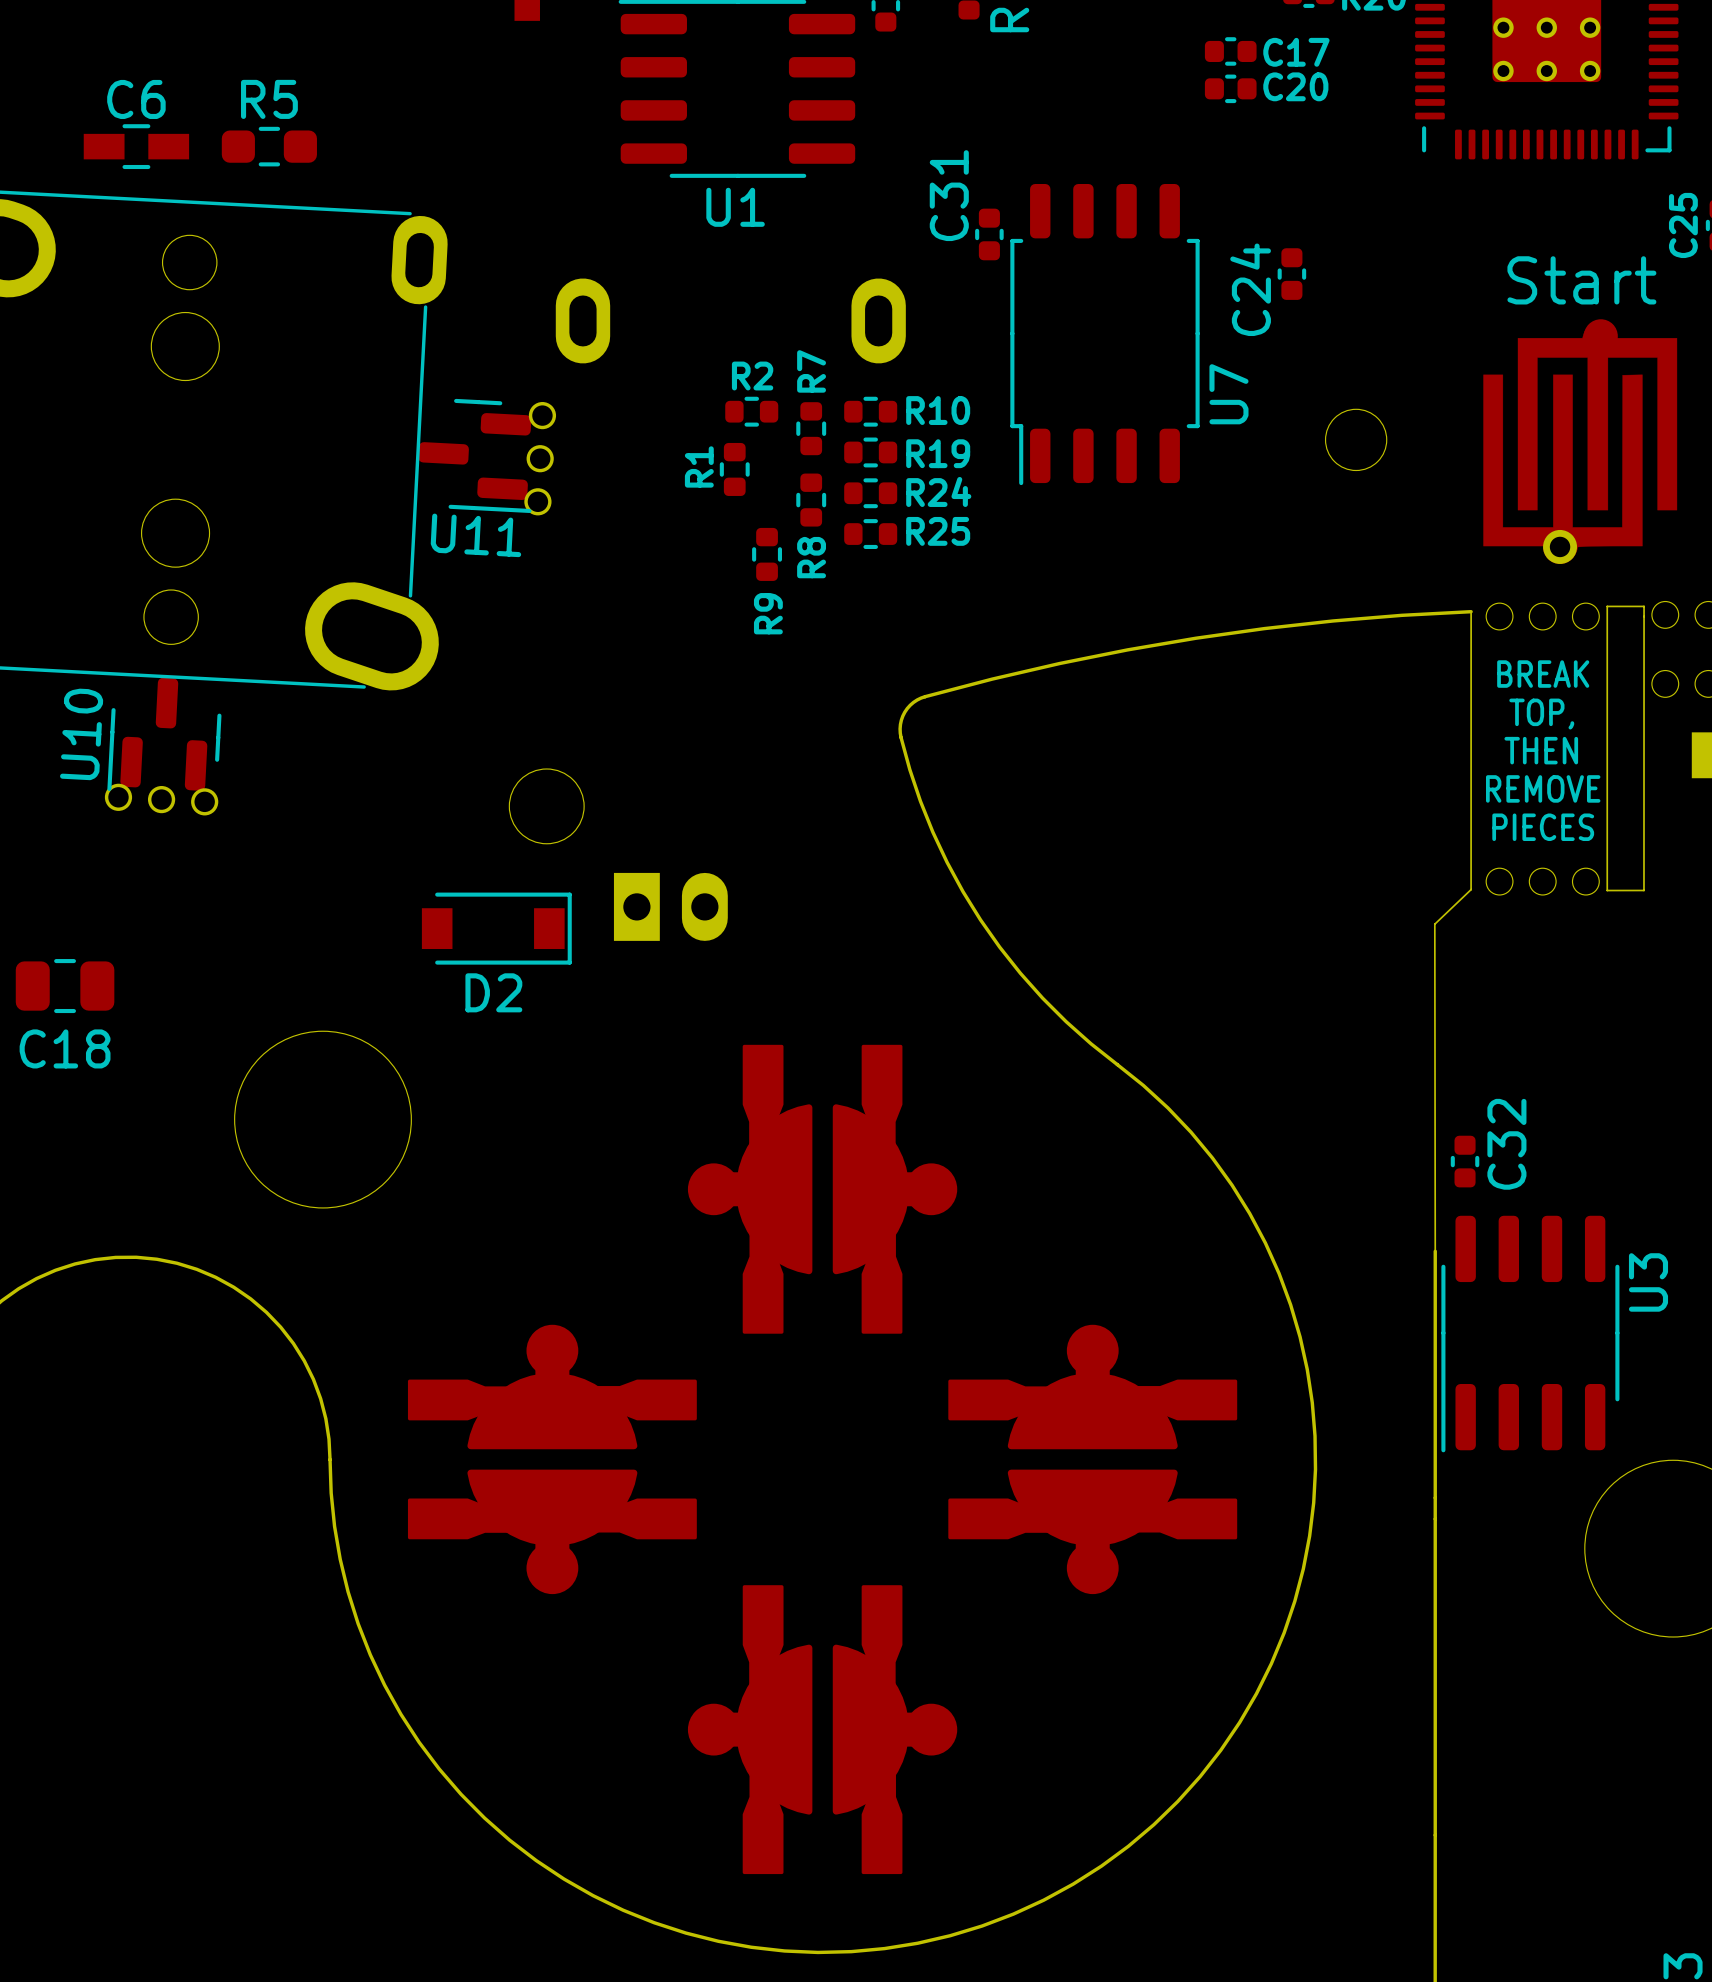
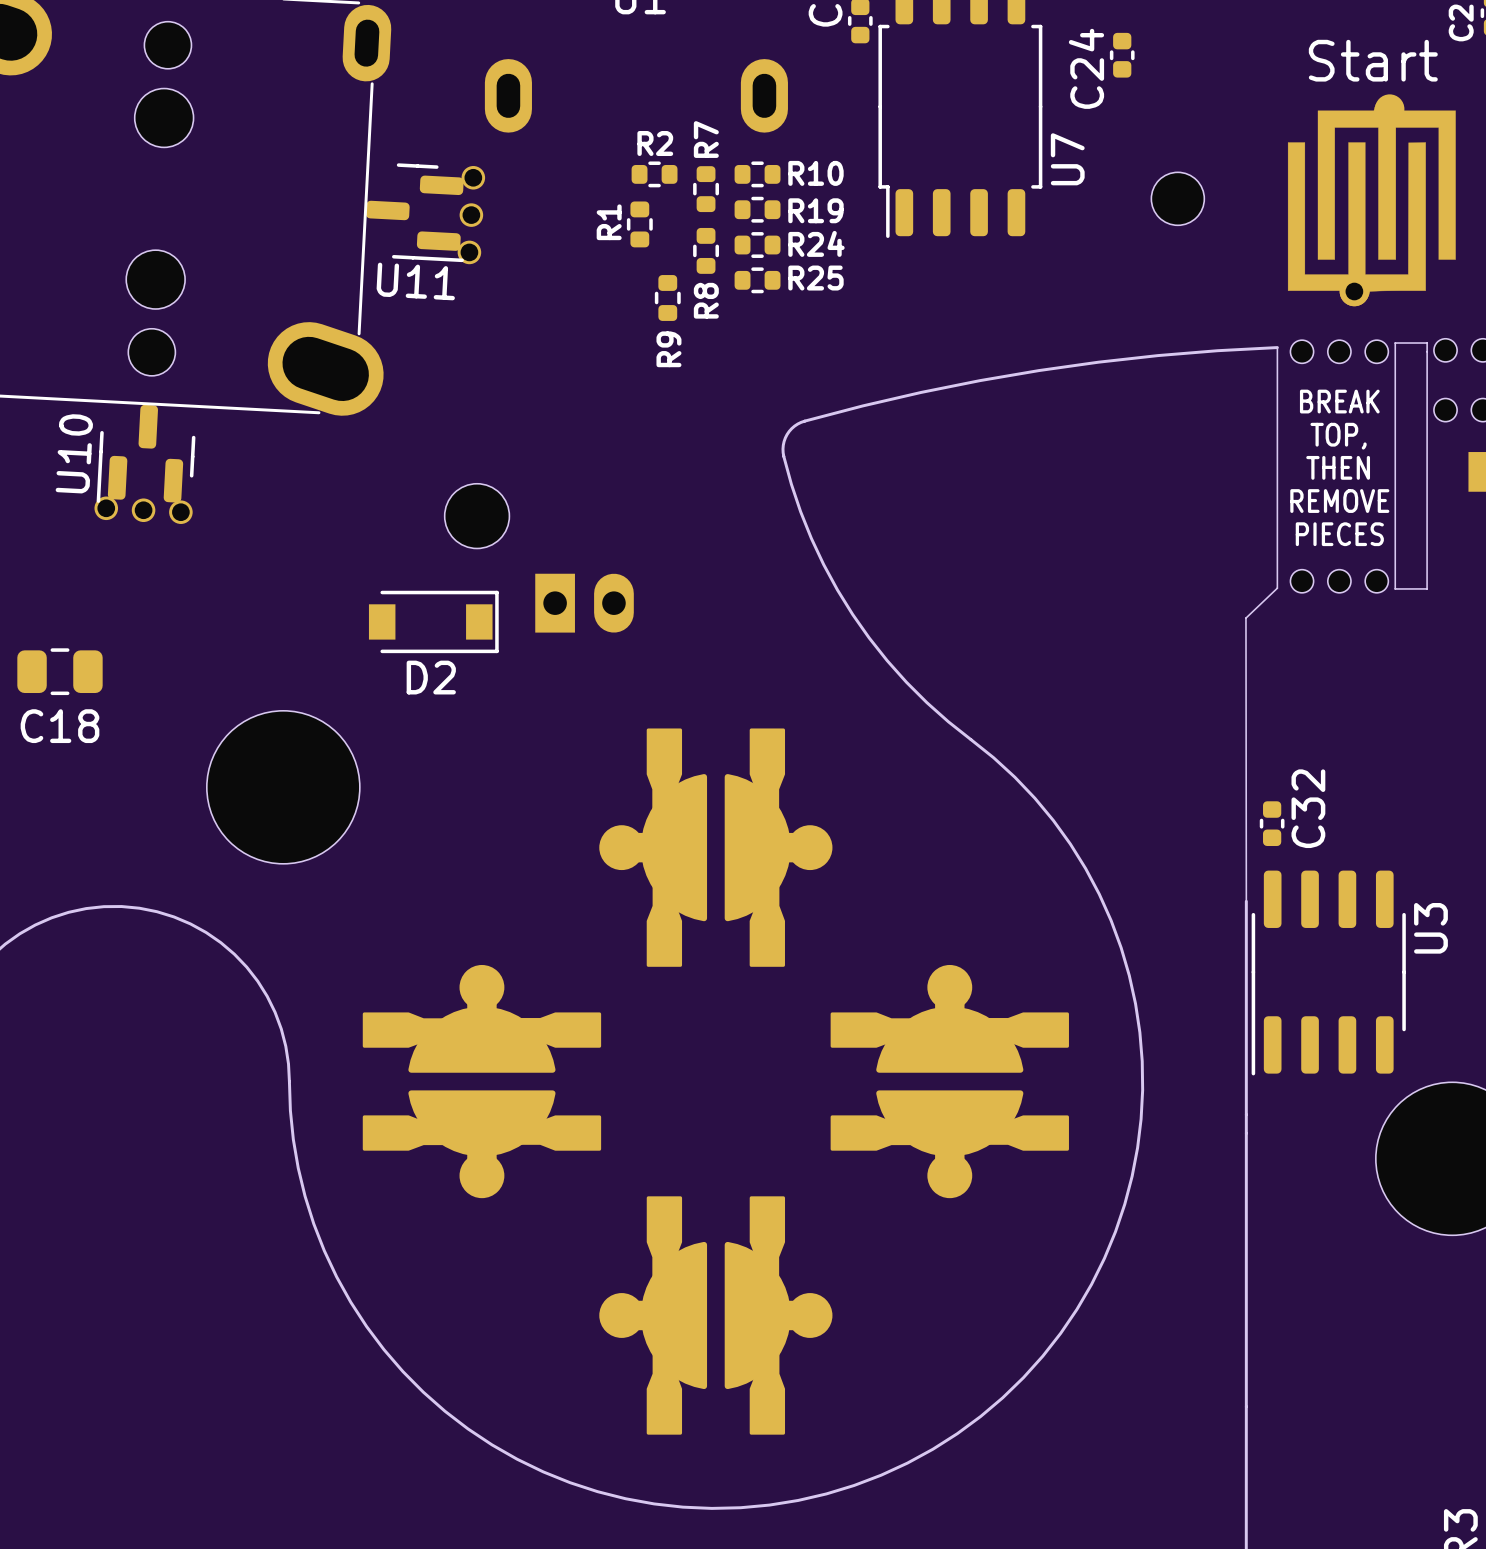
part footprint: [687, 1044, 958, 1334] -> [599, 728, 833, 967]
part footprint: [407, 1324, 697, 1595] -> [362, 964, 602, 1199]
part footprint: [948, 1324, 1238, 1595] -> [830, 964, 1069, 1199]
part footprint: [687, 1585, 958, 1875] -> [599, 1196, 833, 1435]

